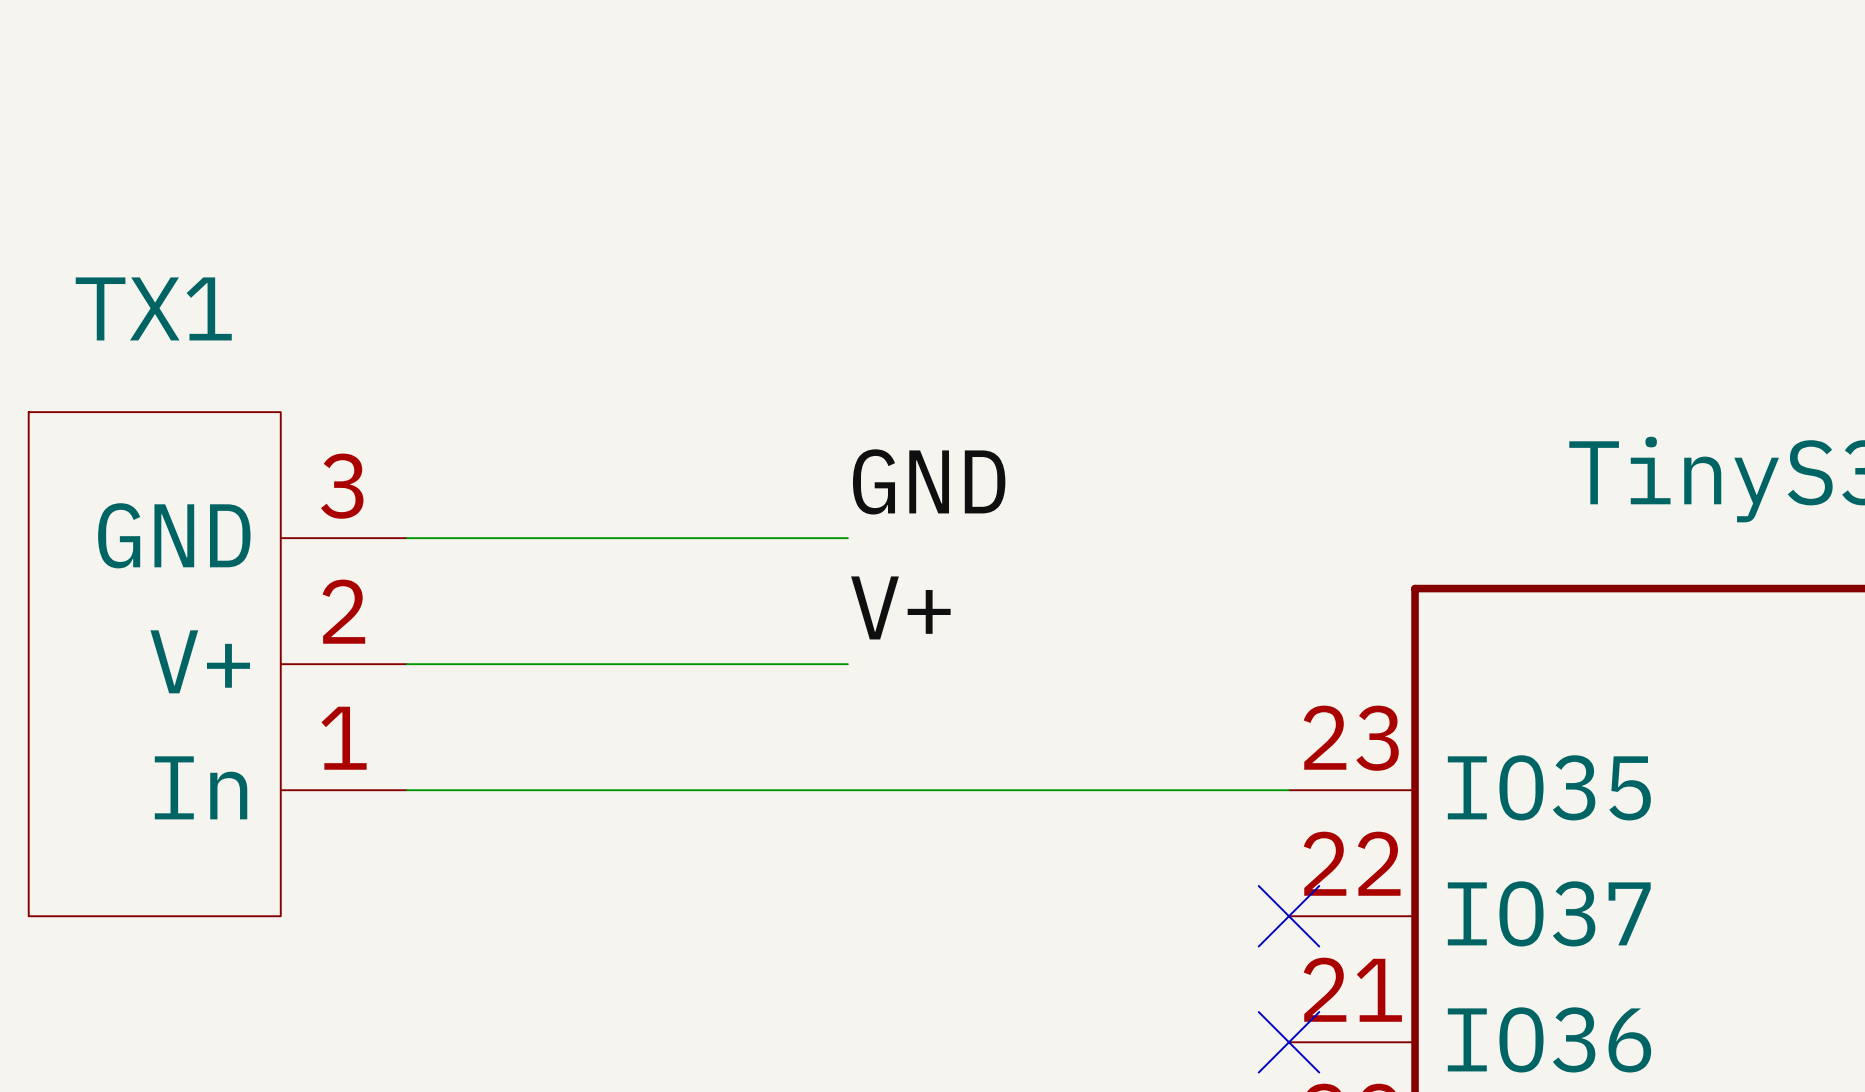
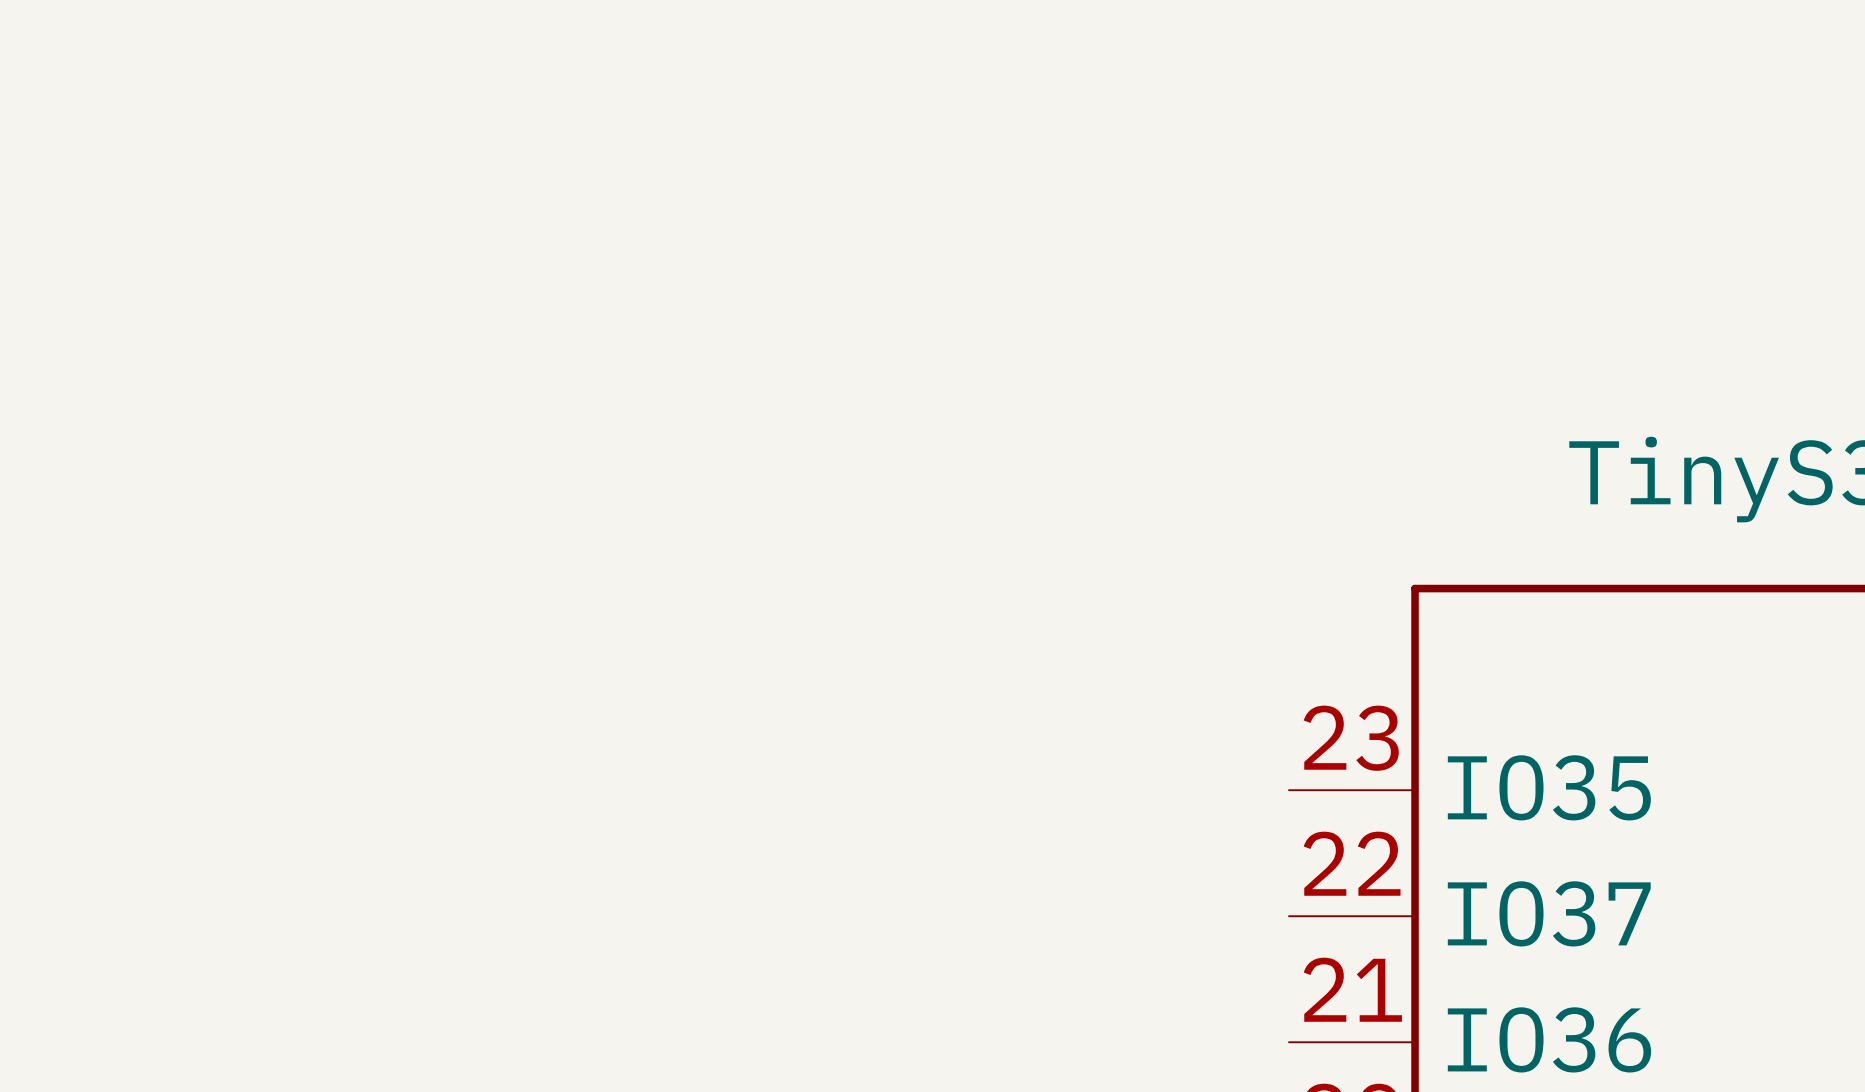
label: GND (929, 481) -> none
wire: (406, 538) (847, 538) -> none
label: V+ (900, 607) -> none
TX1: (217, 664) -> none
wire: (406, 664) (847, 664) -> none
wire: (406, 790) (1289, 790) -> none
no-connect mark: (1289, 916) -> none
no-connect mark: (1289, 1042) -> none

